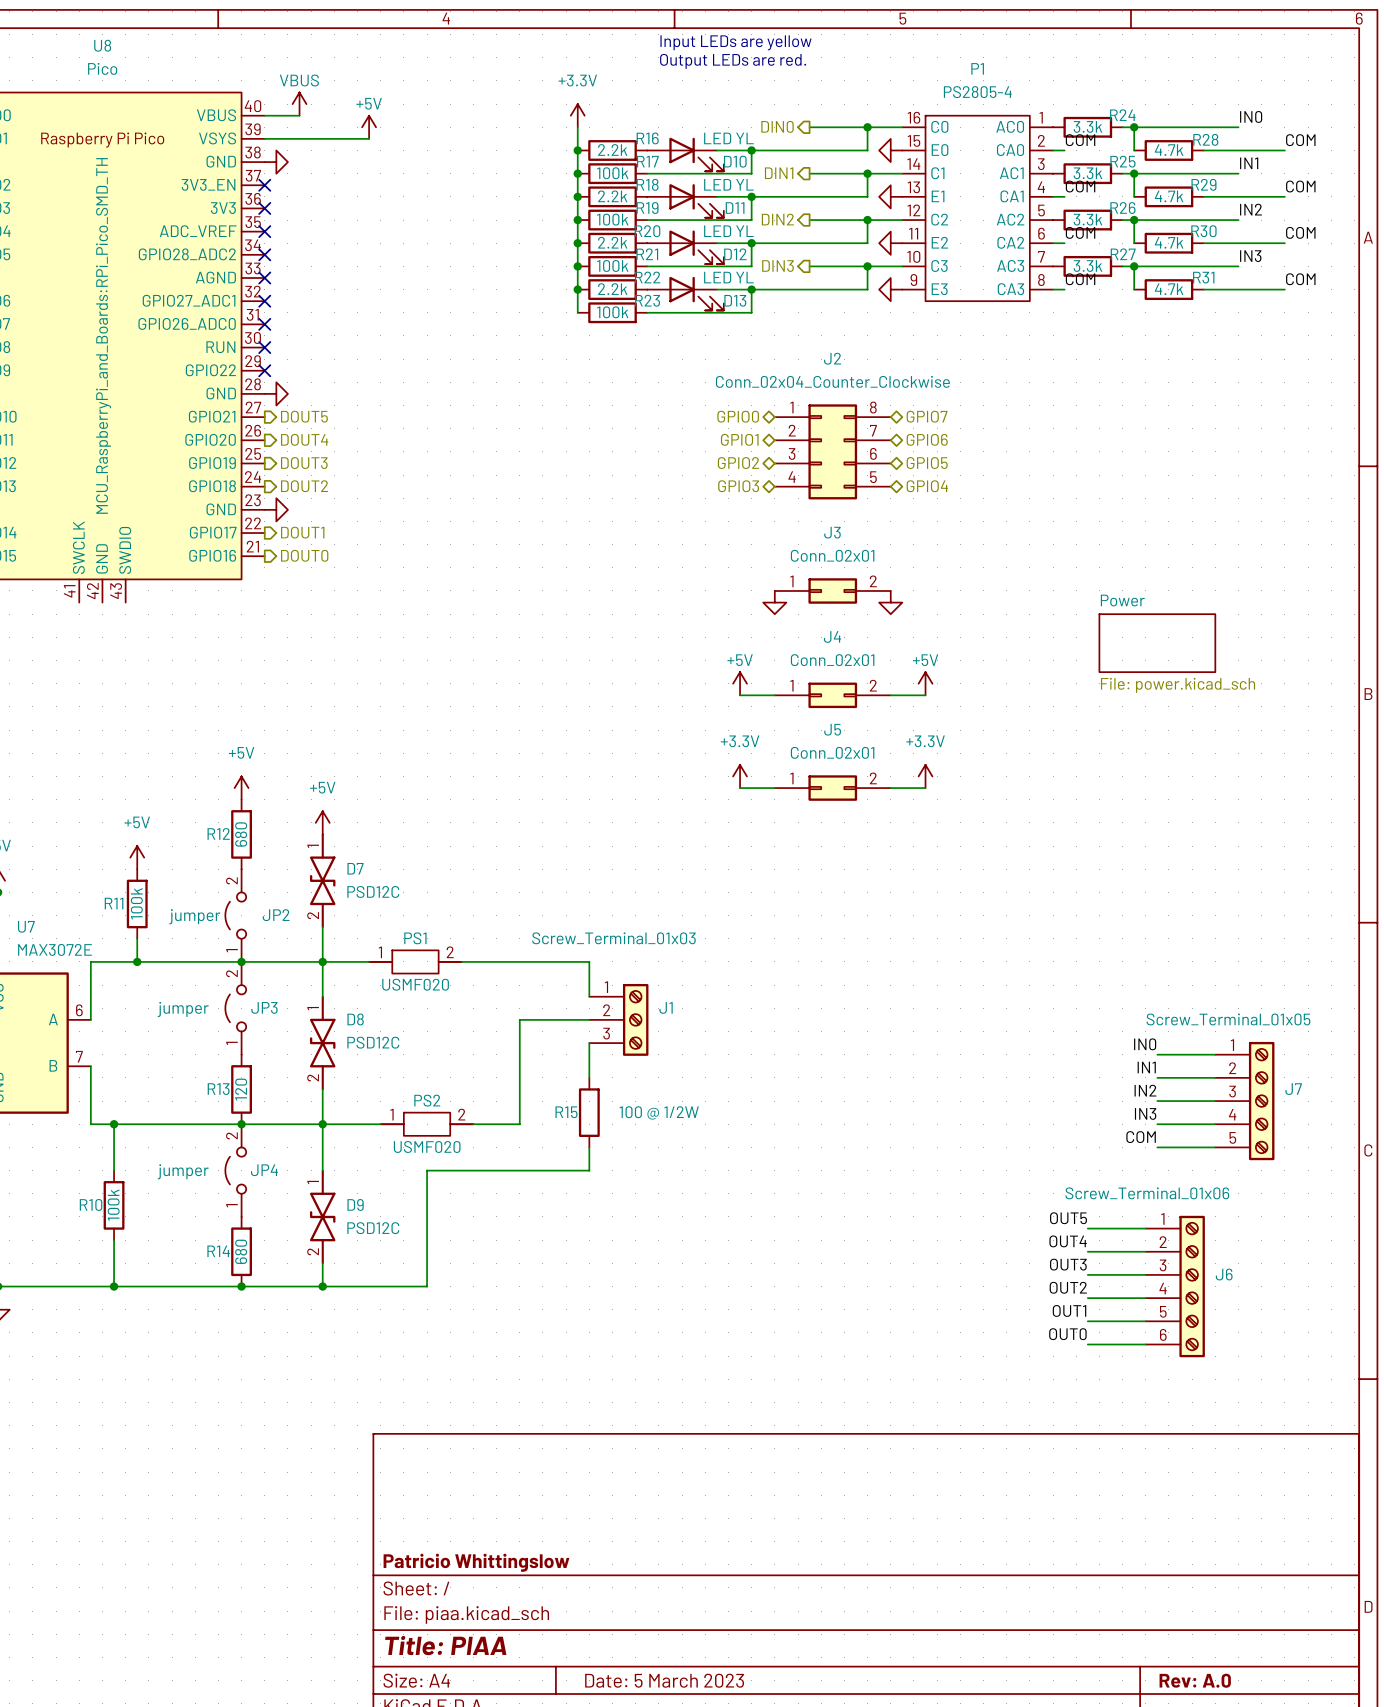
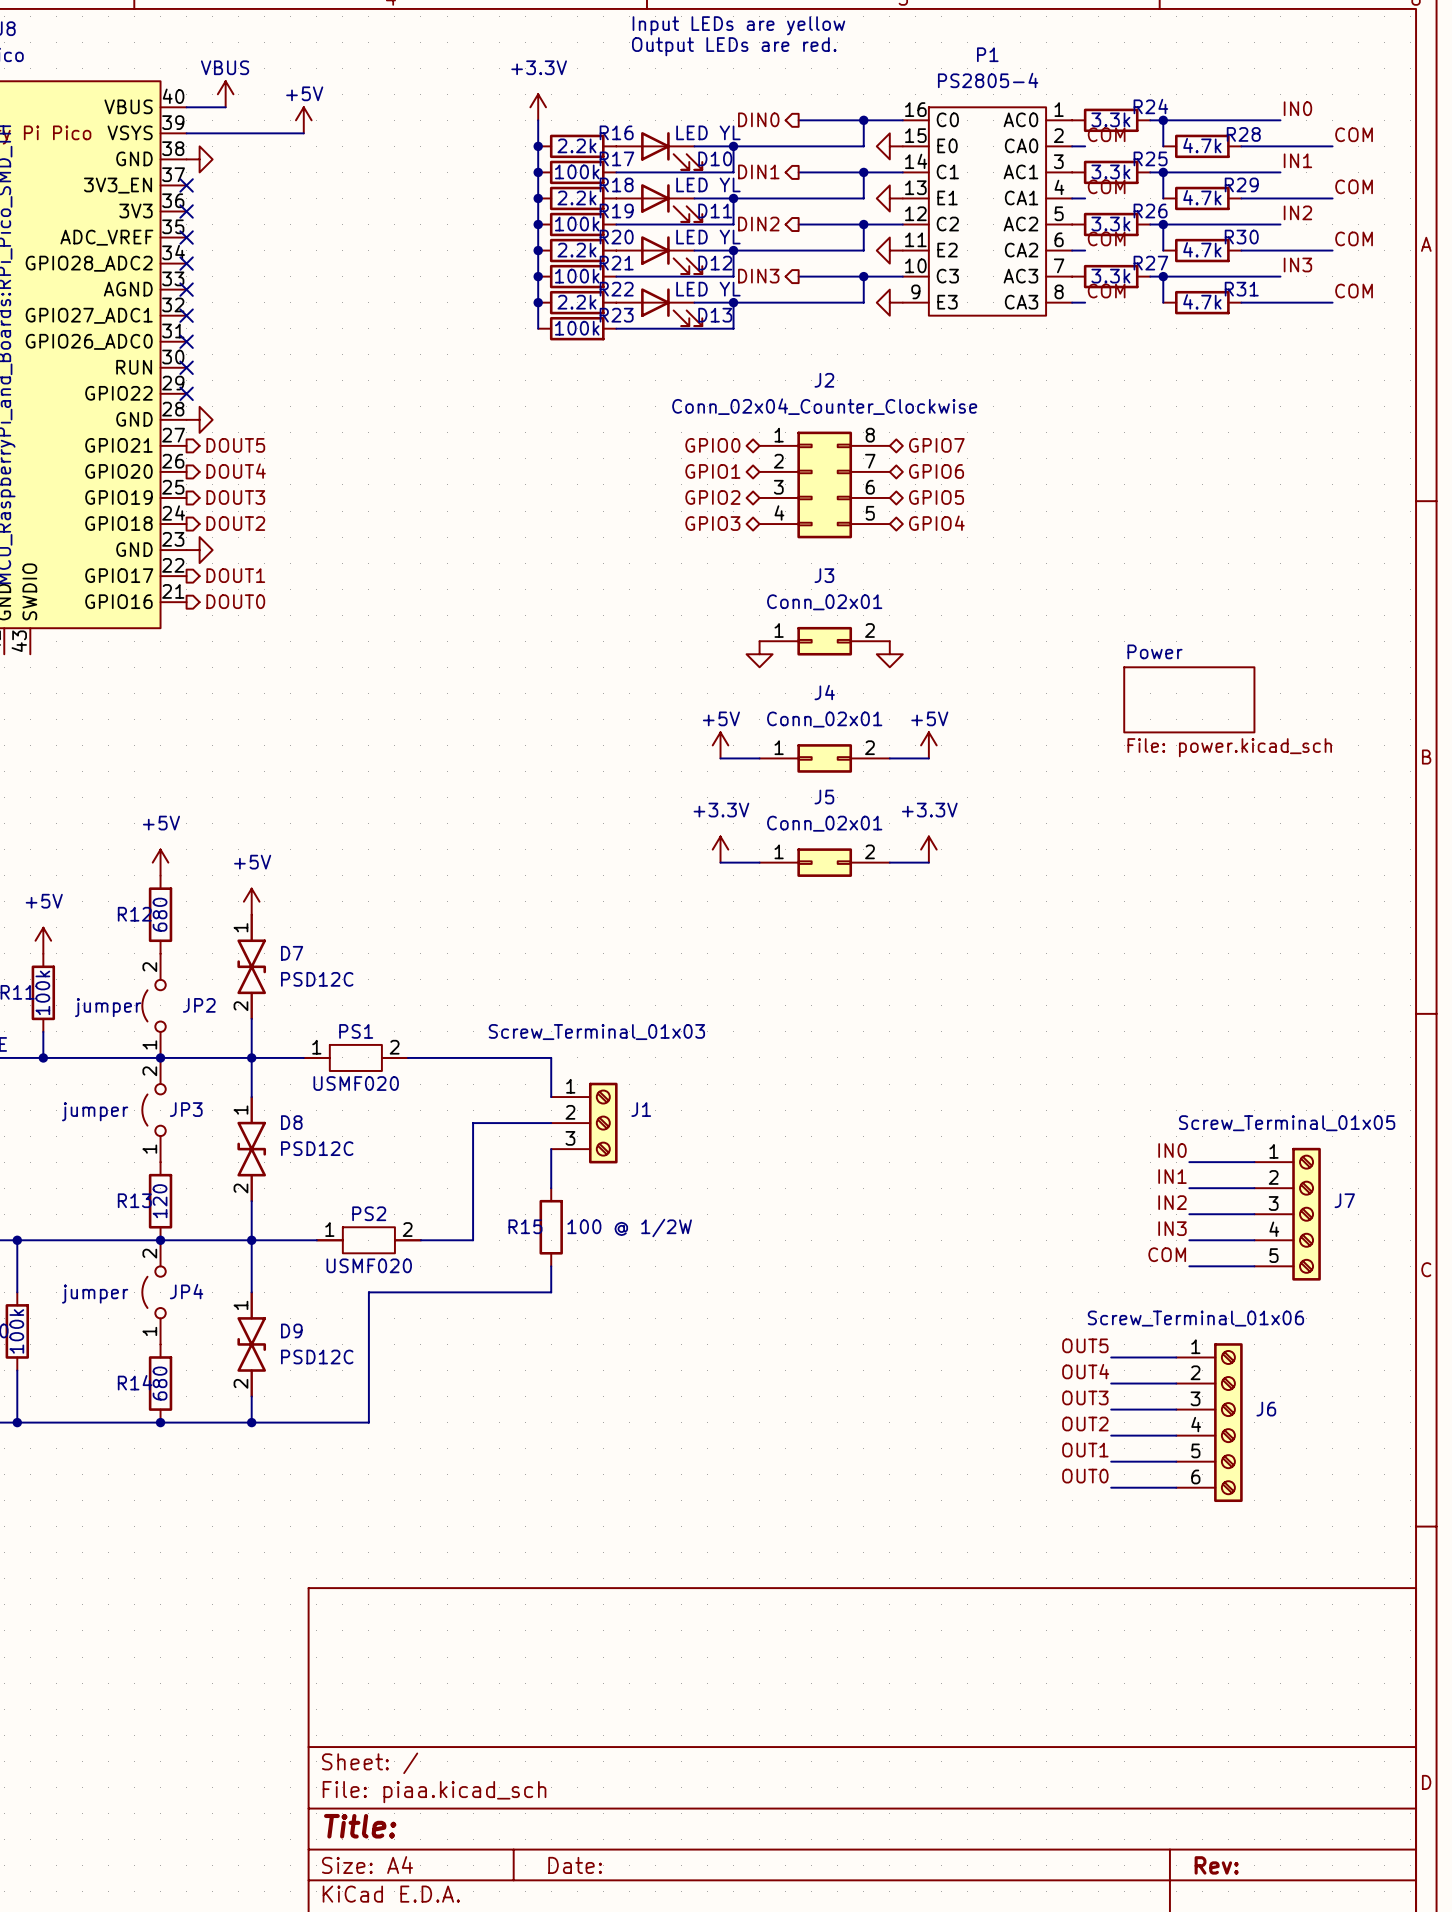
title block: Patricio Whittingslow (476, 1562) -> none
title block: Title: PIAA (445, 1645) -> Title: (360, 1826)
title block: Date: 5 March 2023 (664, 1680) -> Date: (575, 1865)
title block: Rev: A.0 (1195, 1680) -> Rev: (1216, 1865)

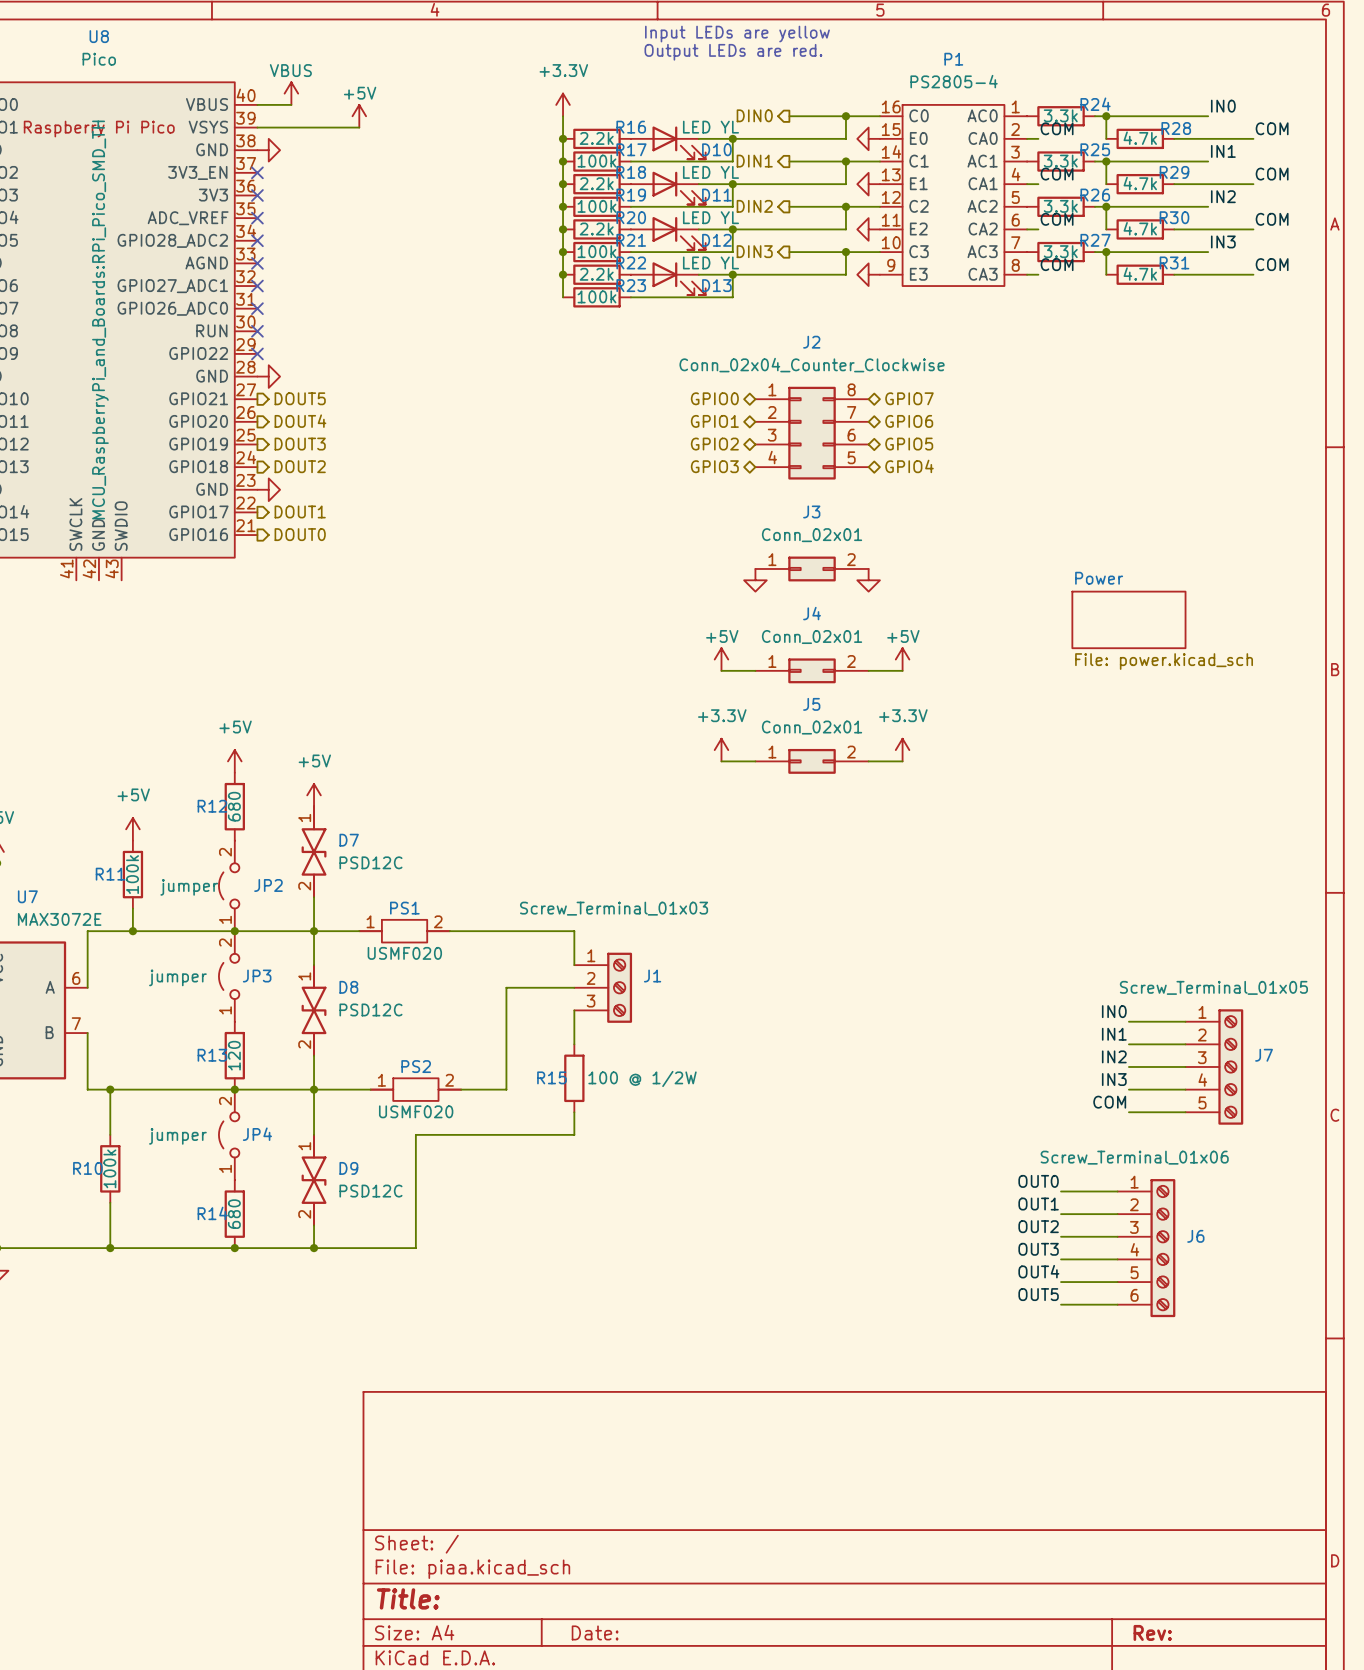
label: OUT5 (1085, 1345) -> OUT0 (1038, 1181)
label: OUT4 (1085, 1371) -> OUT1 (1038, 1204)
label: OUT3 (1085, 1397) -> OUT2 (1038, 1226)
label: OUT2 (1085, 1424) -> OUT3 (1038, 1249)
label: OUT1 (1085, 1450) -> OUT4 (1038, 1271)
label: OUT0 (1085, 1476) -> OUT5 (1038, 1294)

